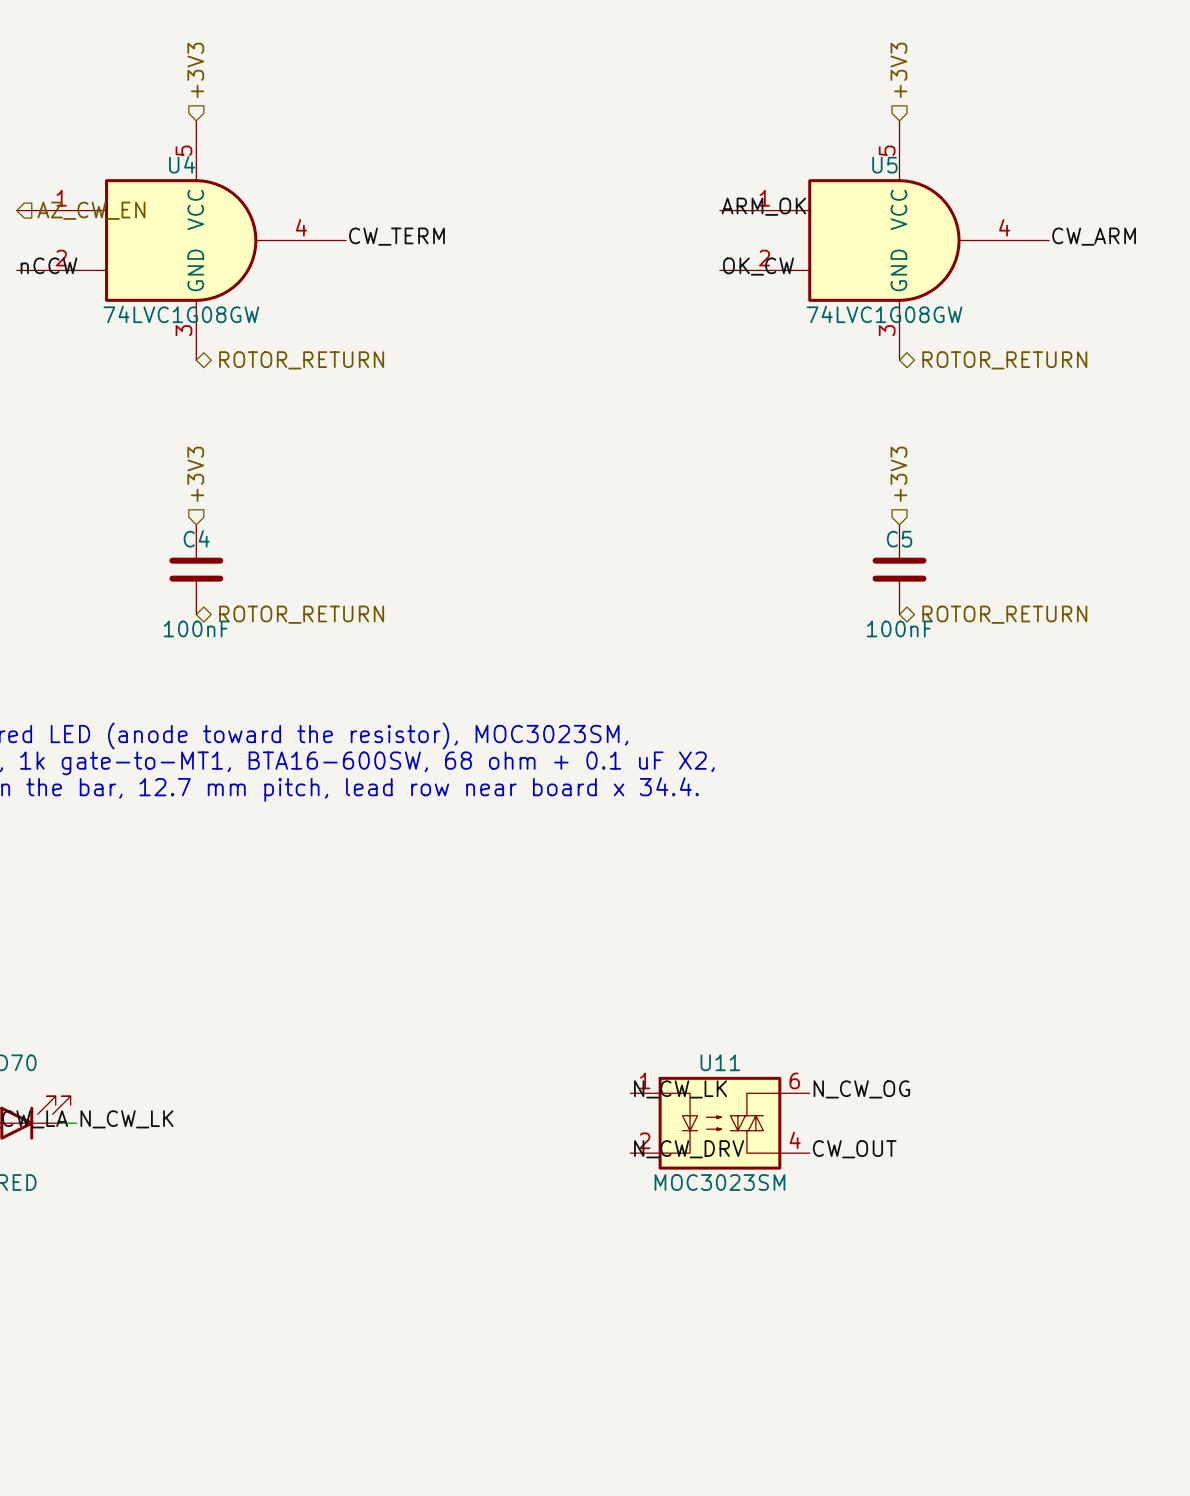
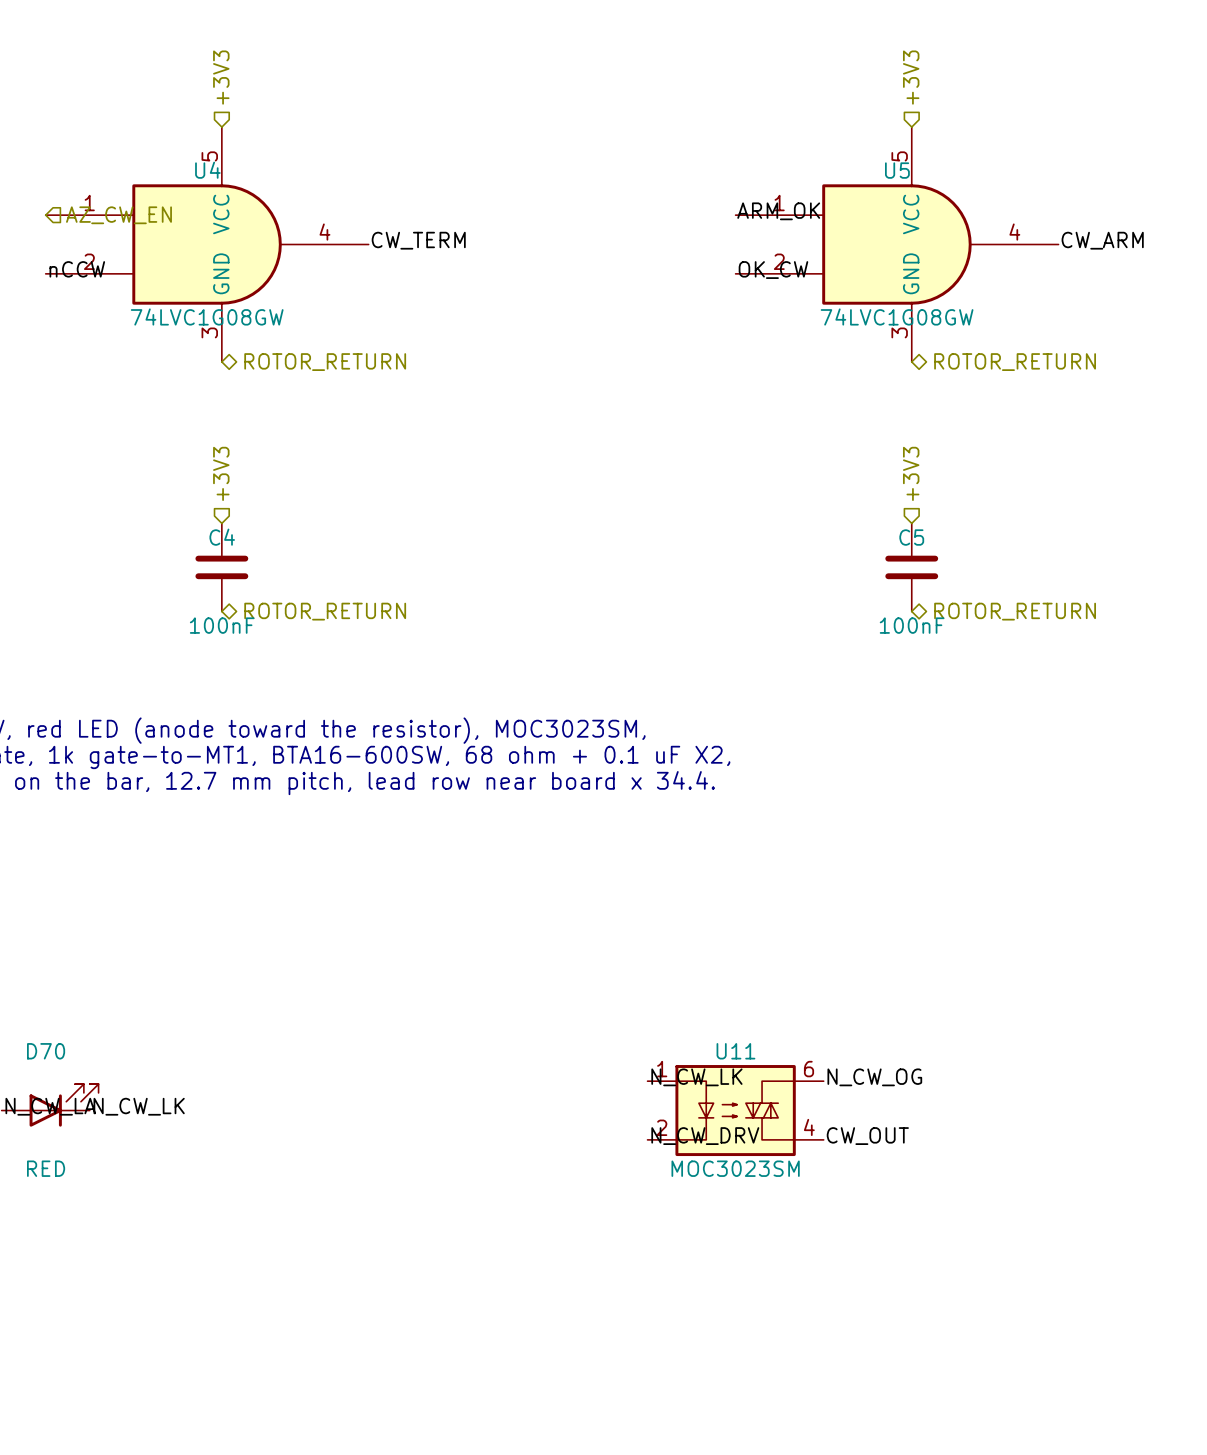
label position: N_CW_LK (126, 1119) -> N_CW_LK (139, 1106)
wire: (61, 1123) (76, 1123) -> none

